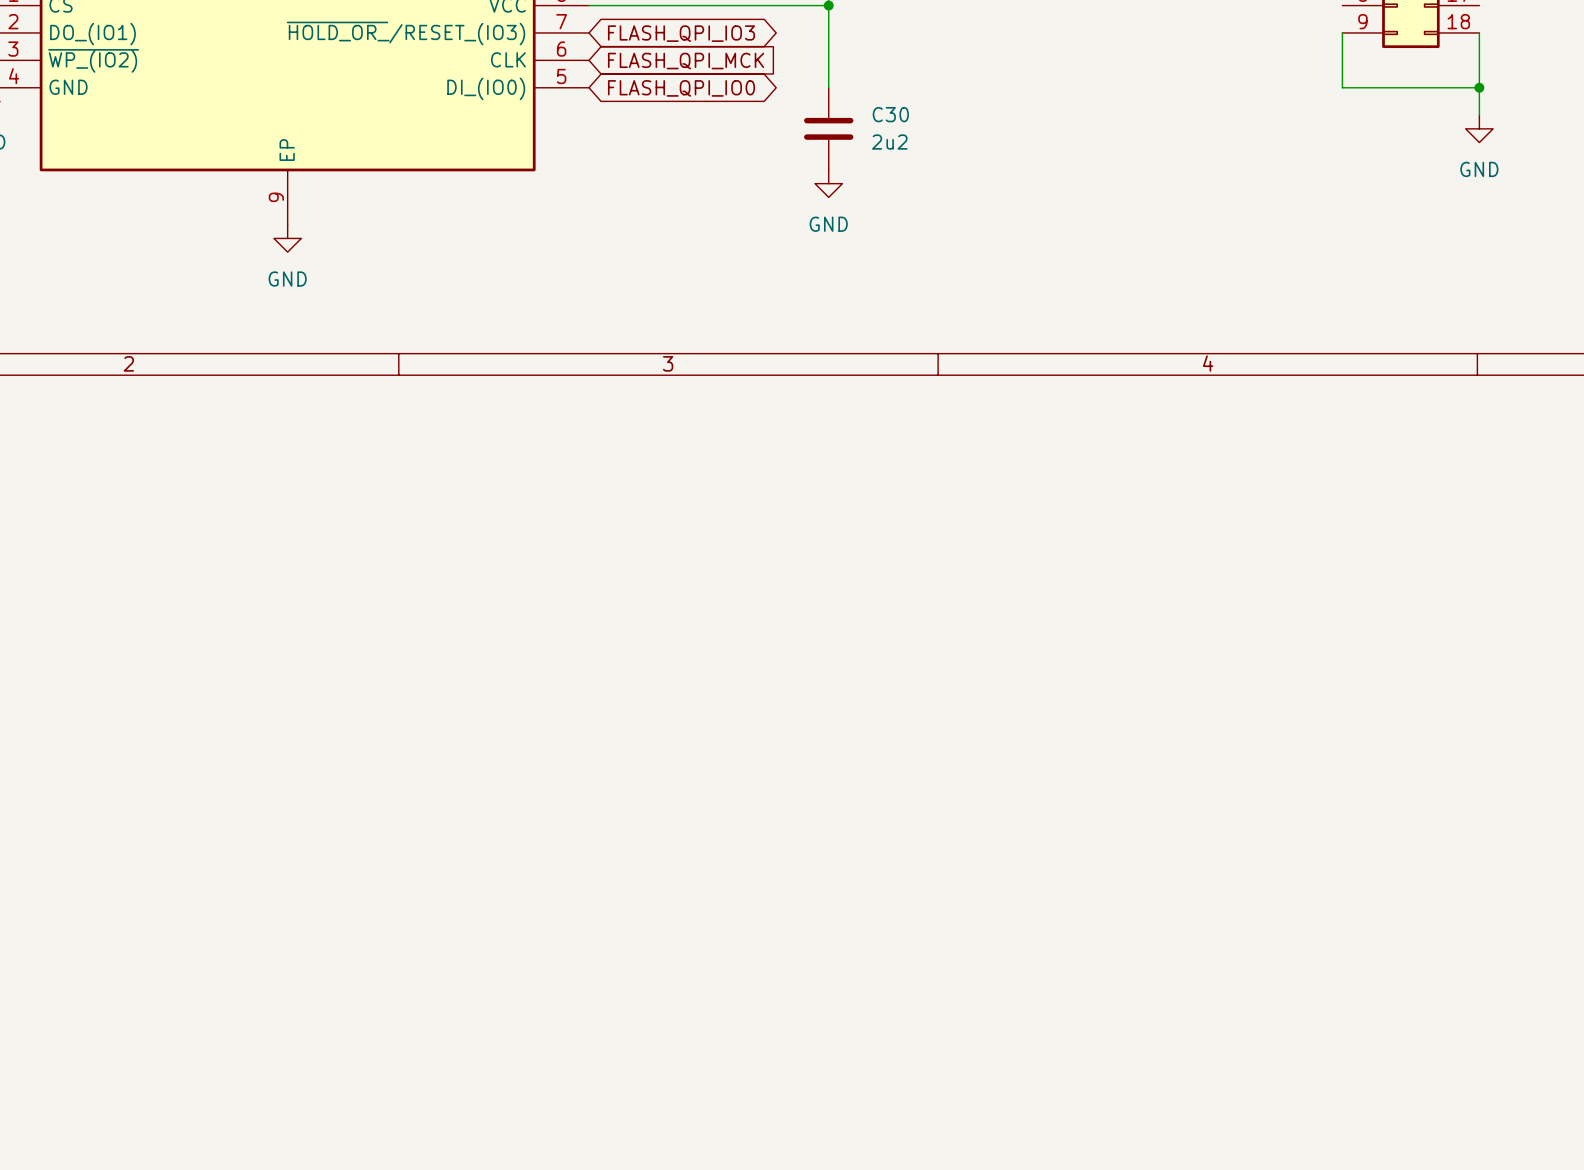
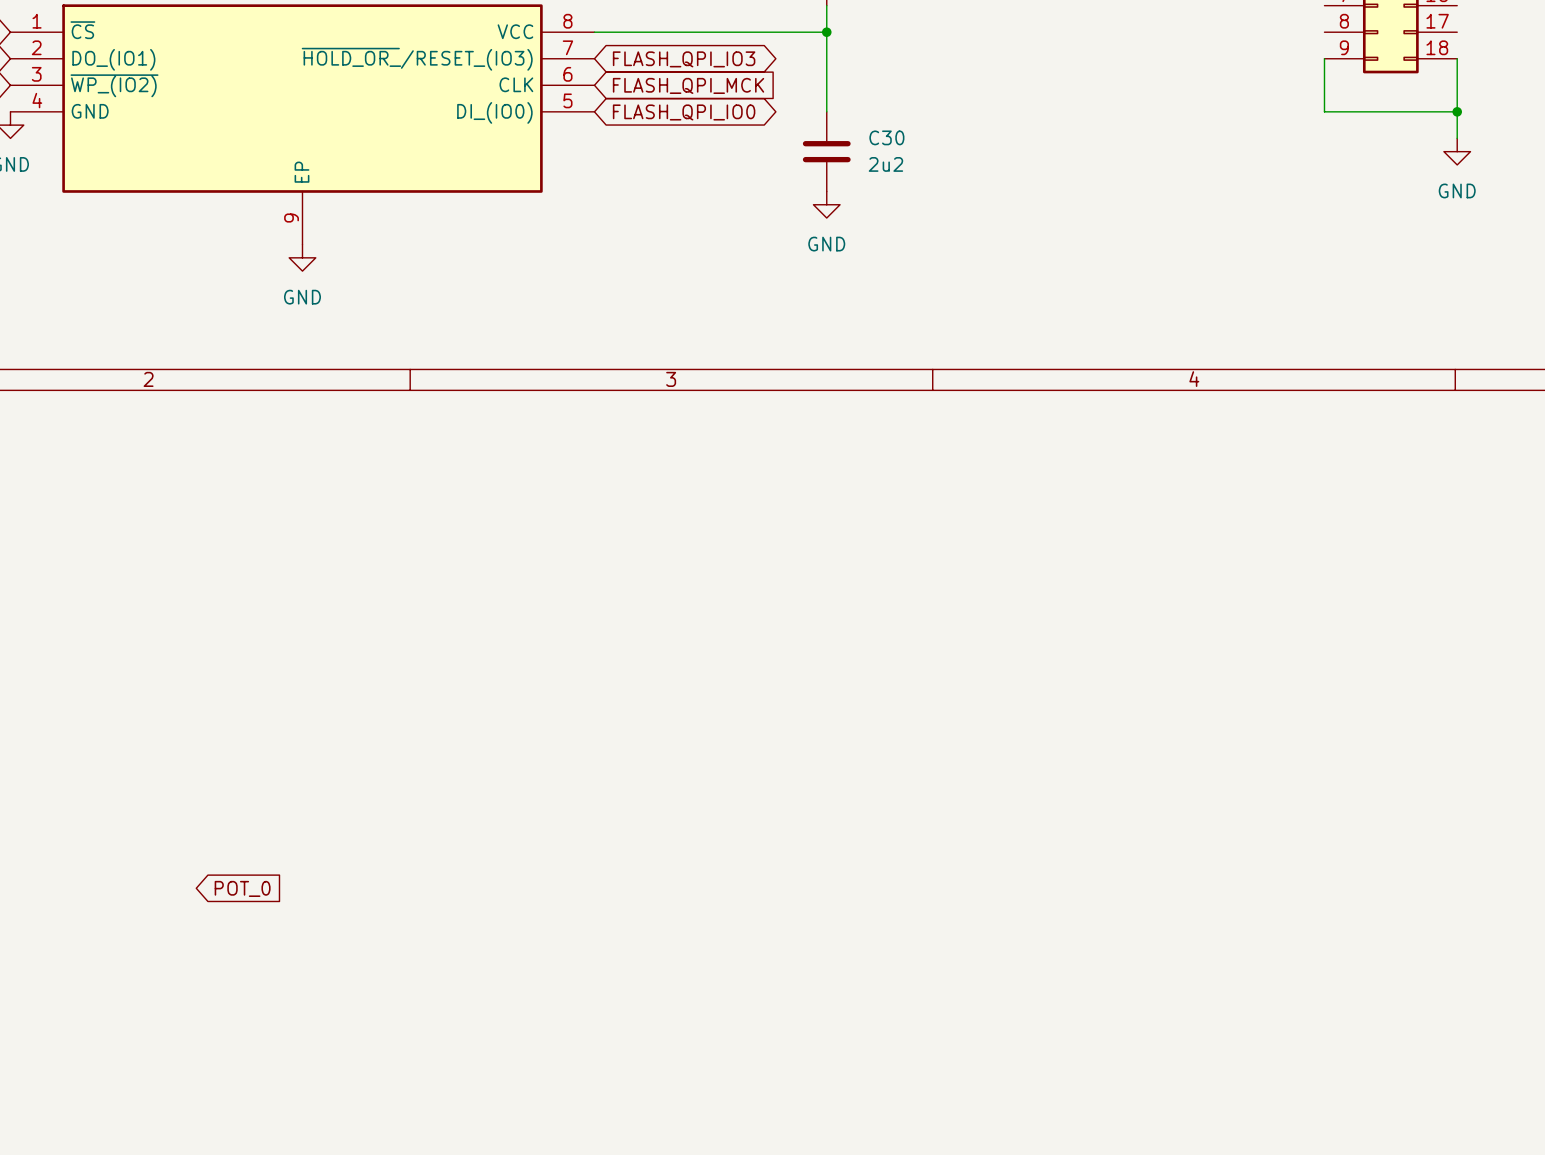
global label: none -> POT_0 (242, 888)

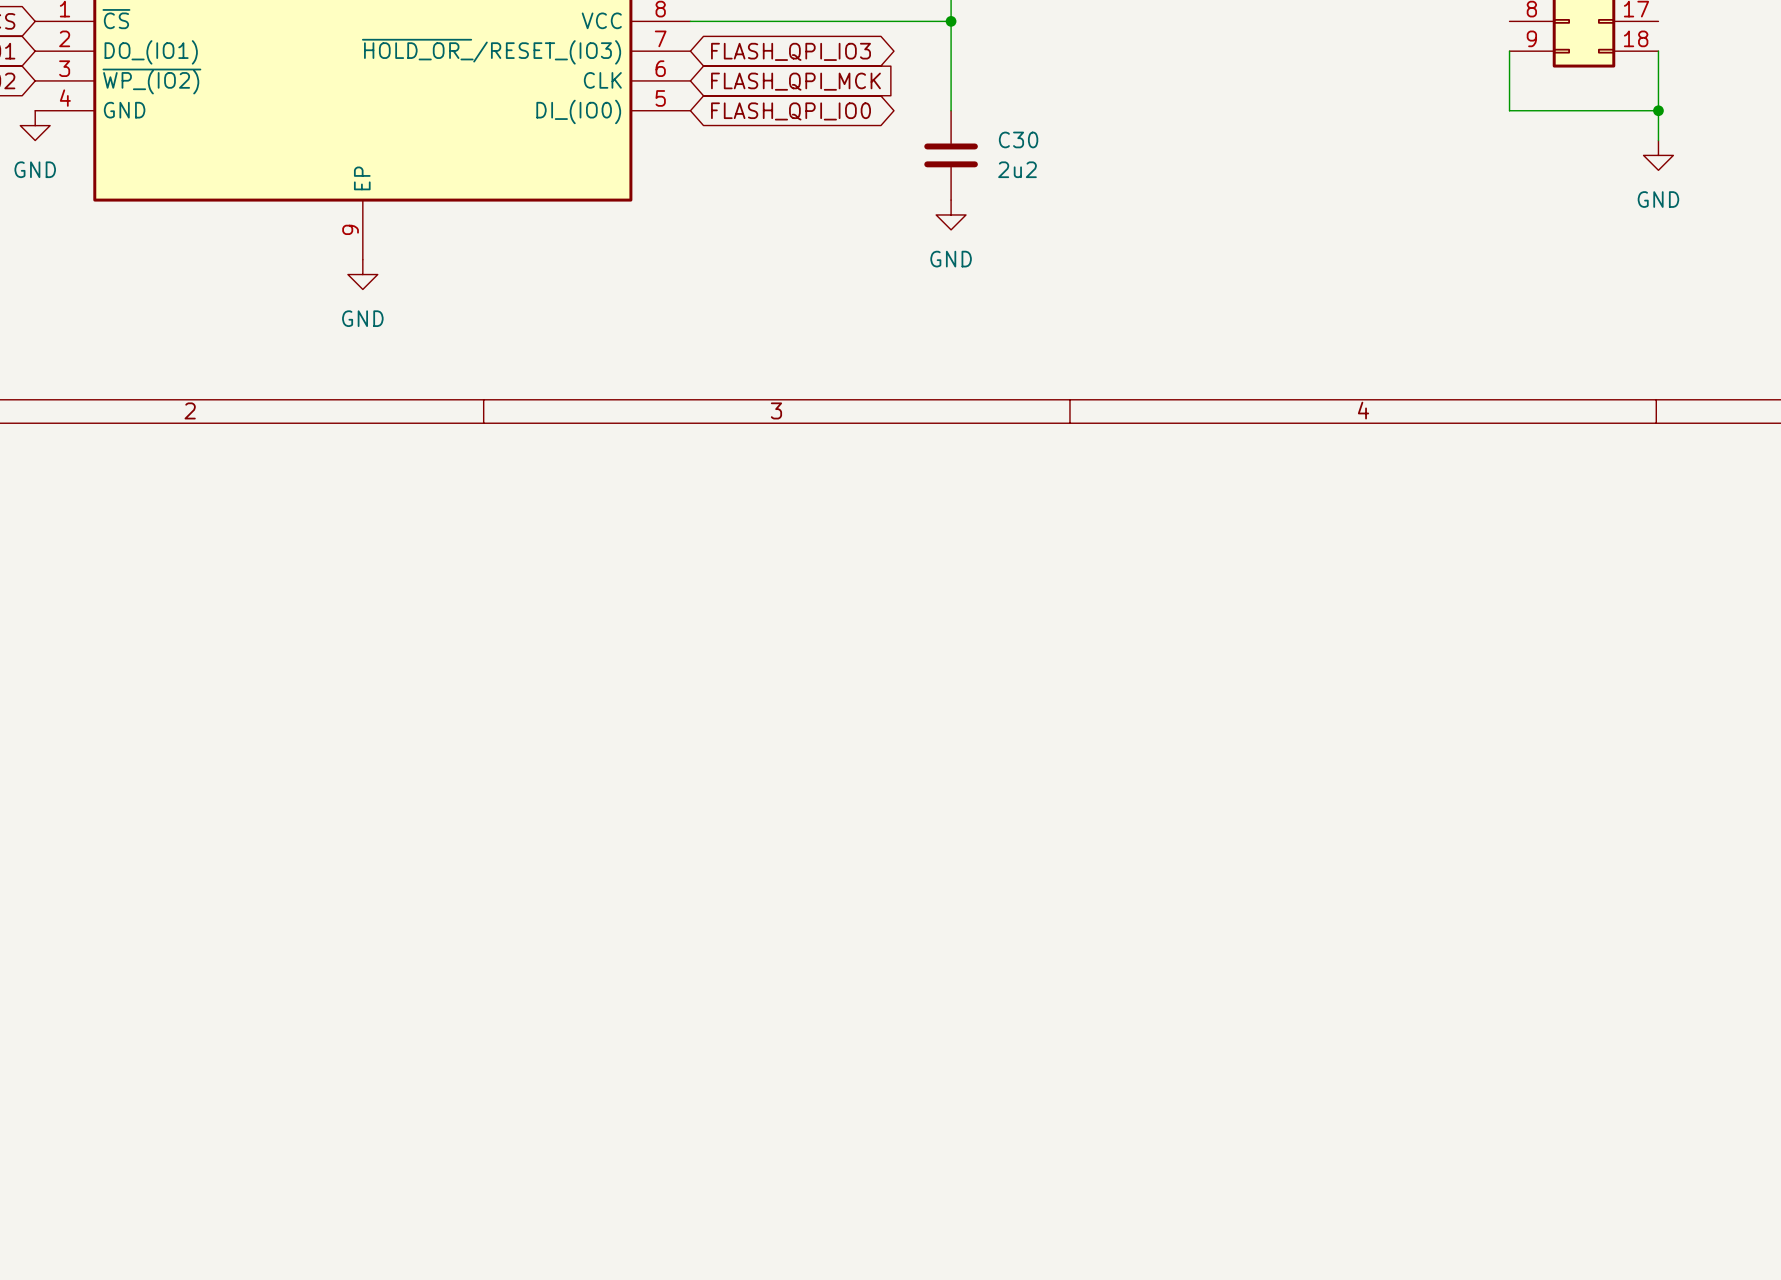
global label: POT_0 (242, 888) -> none

